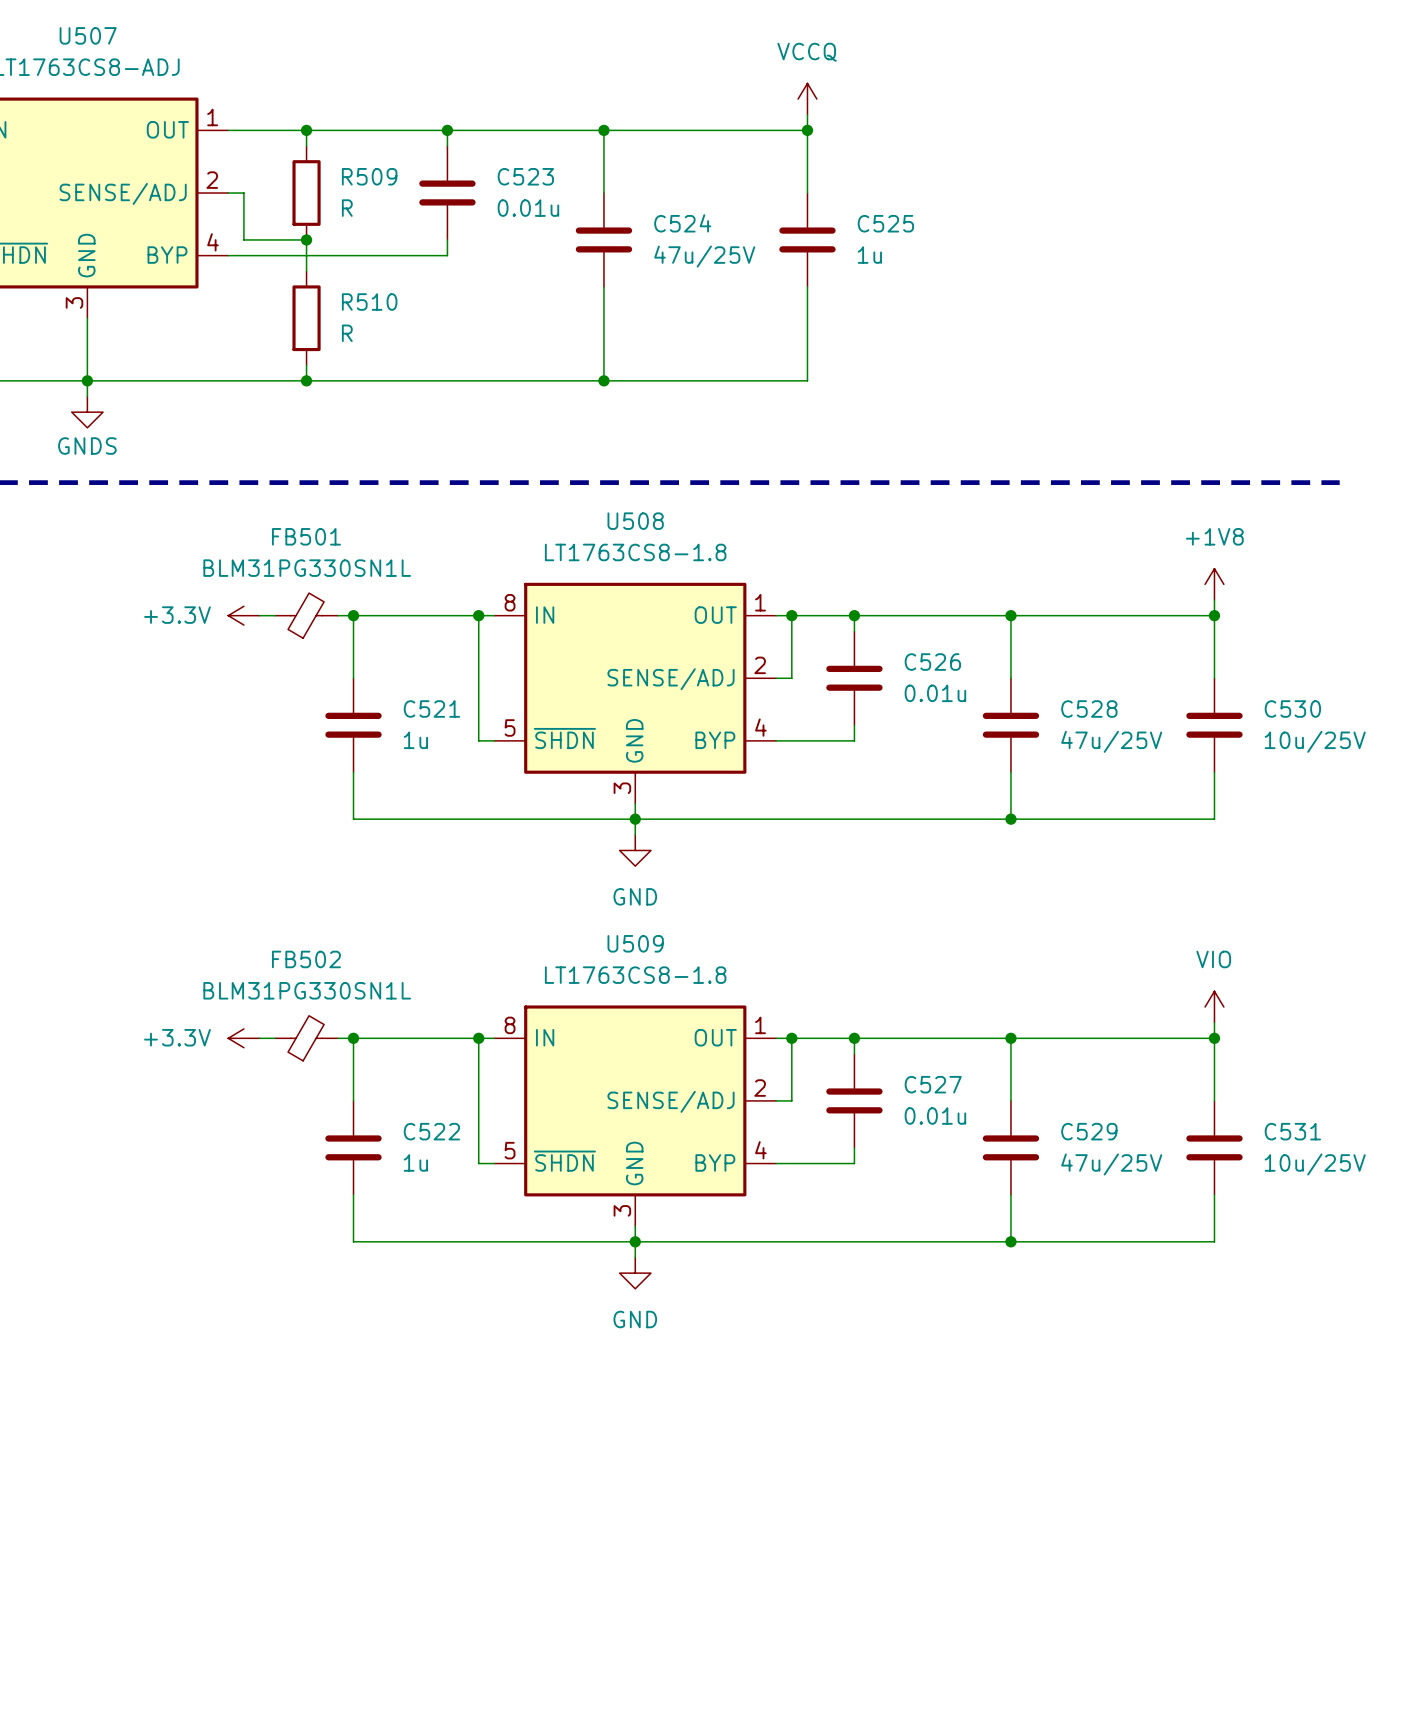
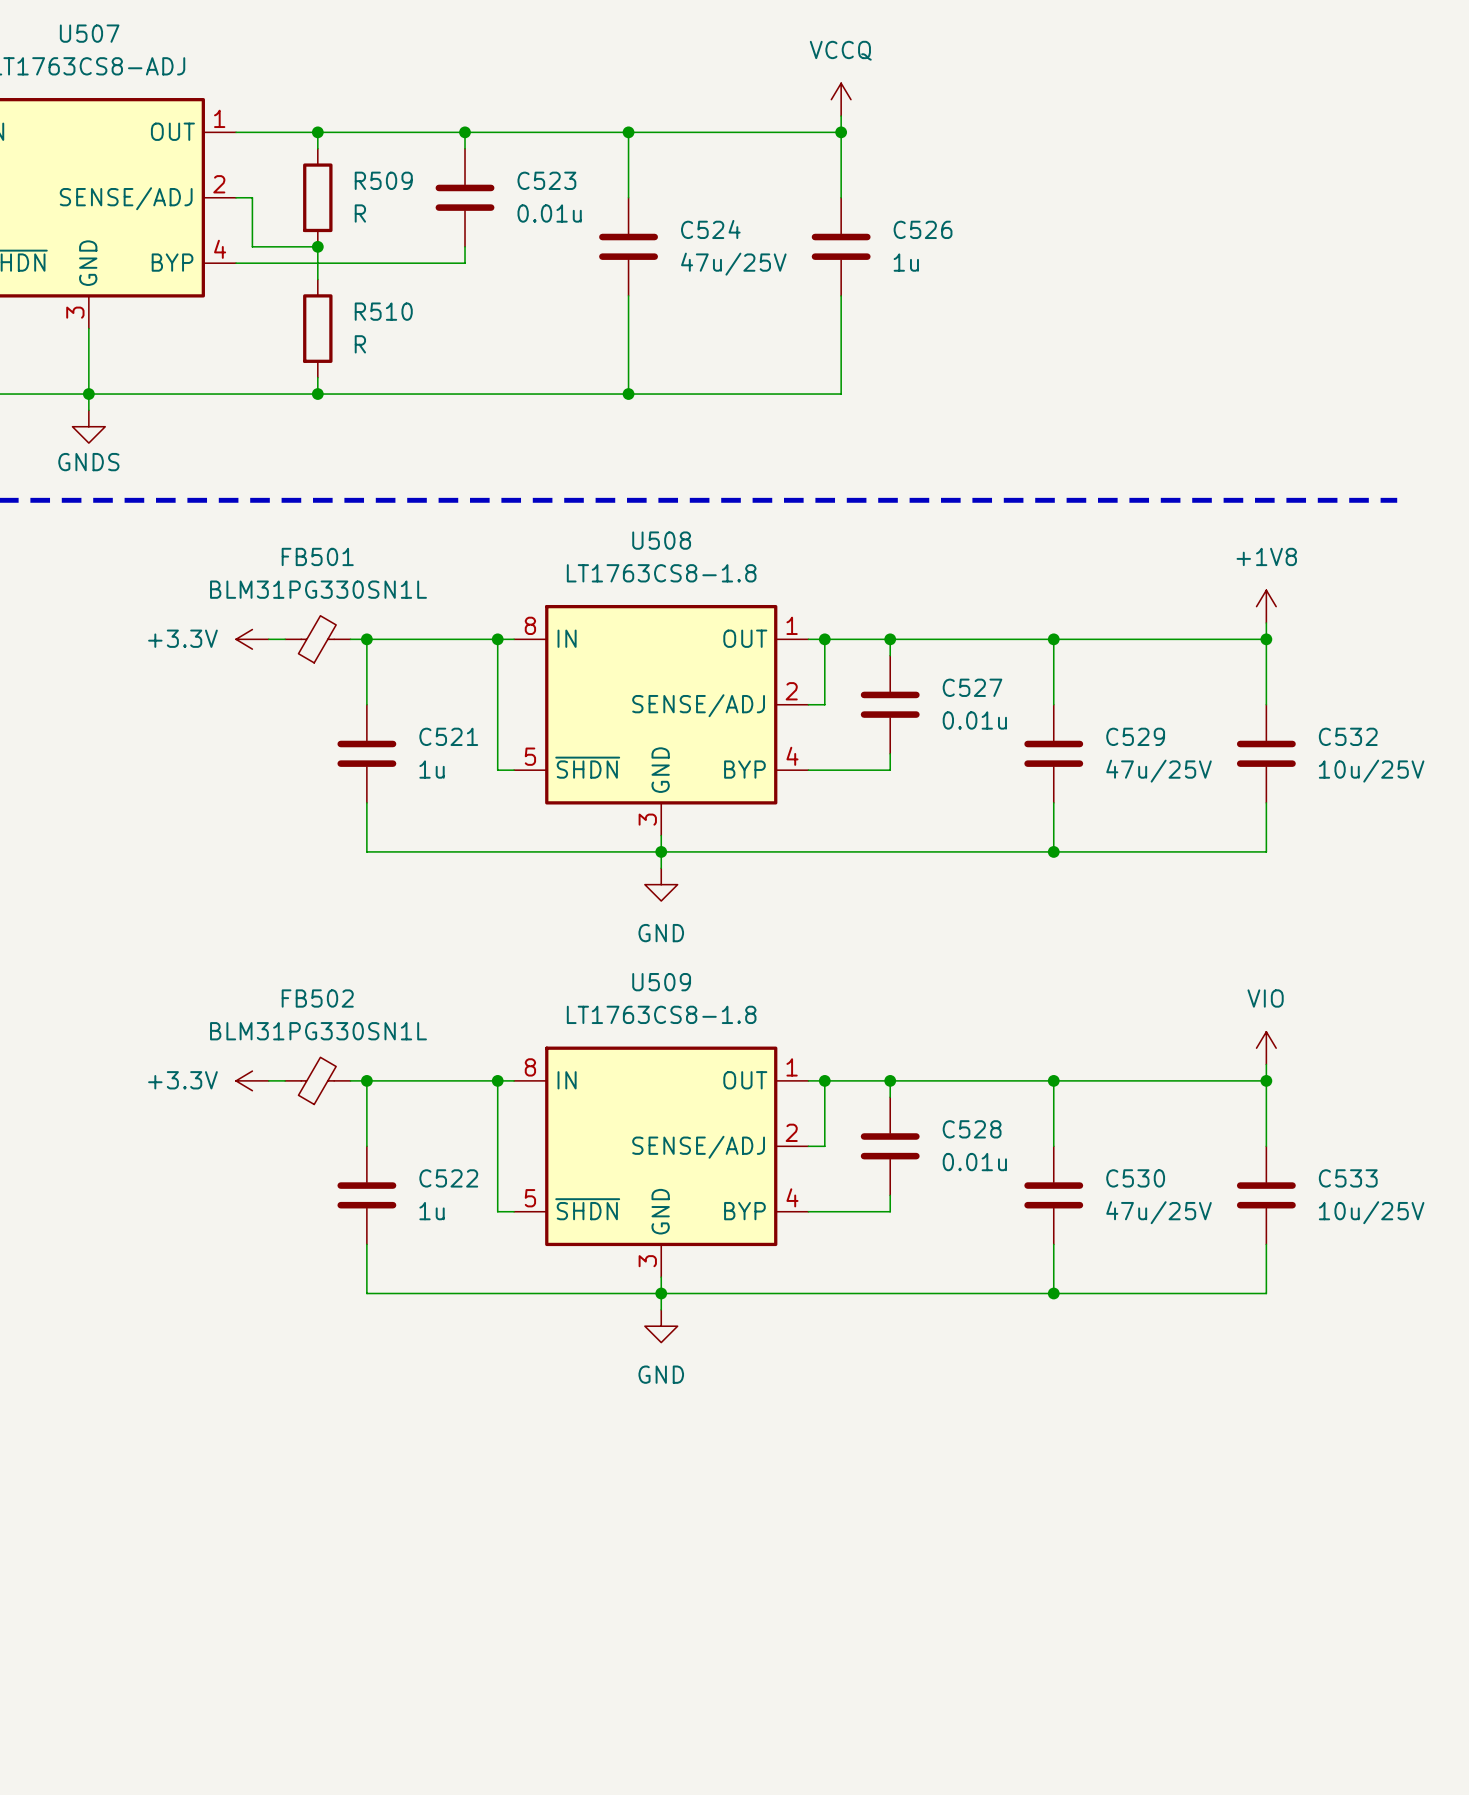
C525 name: C525 (885, 223) -> C526 (923, 229)
C526 name: C526 (932, 662) -> C527 (972, 687)
C528 name: C528 (1089, 709) -> C529 (1135, 736)
C530 name: C530 (1292, 709) -> C532 (1348, 736)
C527 name: C527 (933, 1084) -> C528 (972, 1129)
C529 name: C529 (1089, 1131) -> C530 (1135, 1178)
C531 name: C531 (1292, 1131) -> C533 (1348, 1178)

